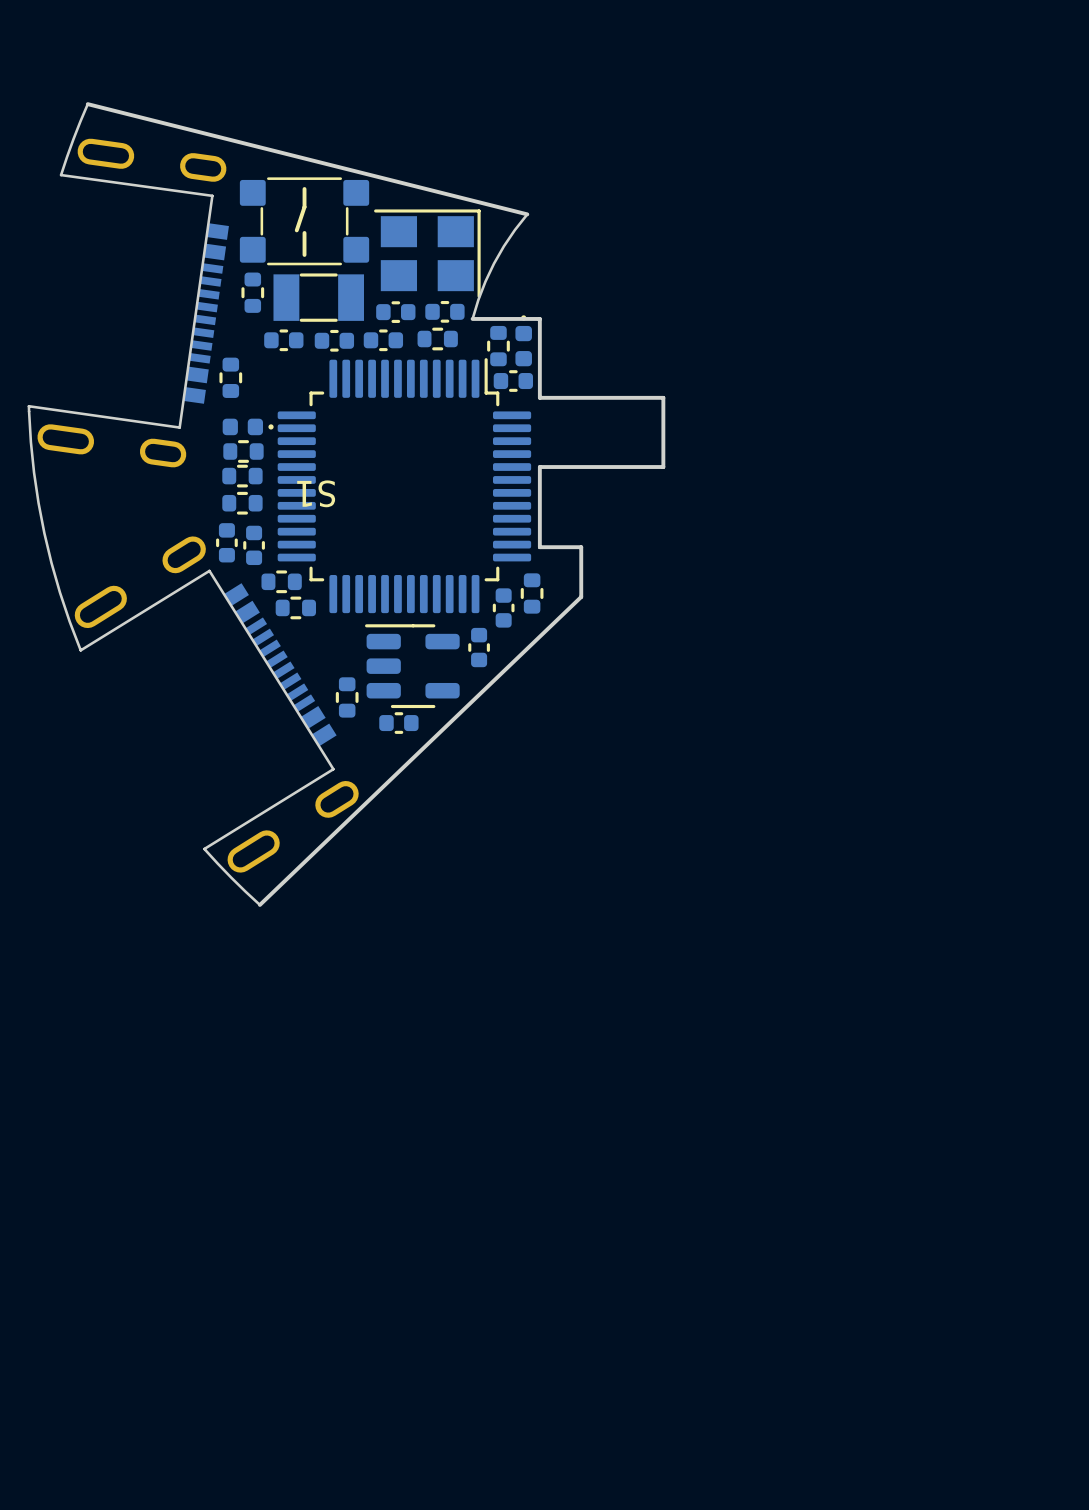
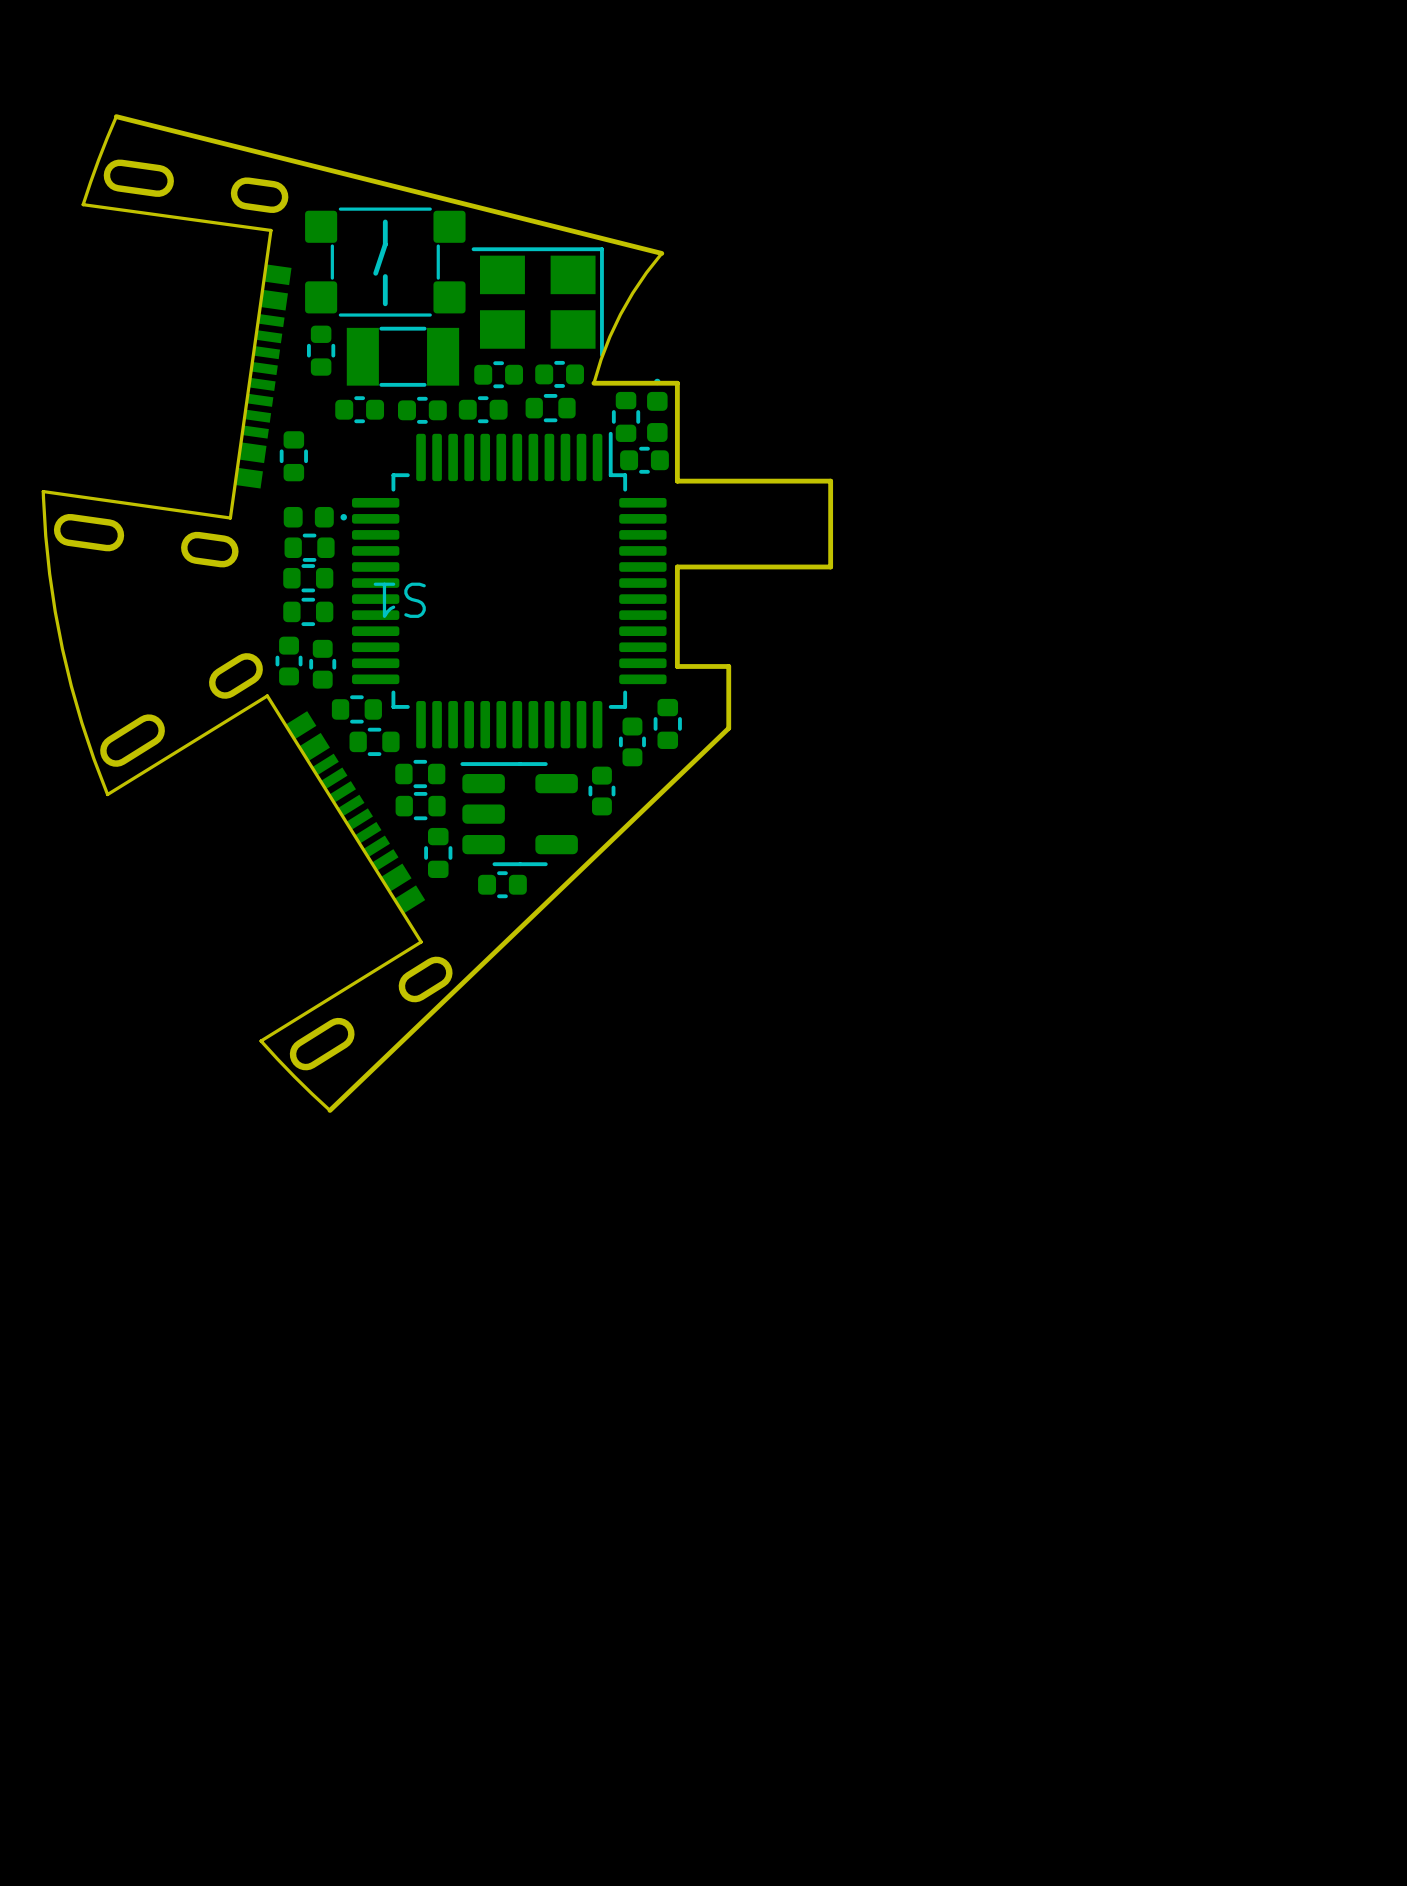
part: none -> (420, 774)
part: none -> (420, 806)

